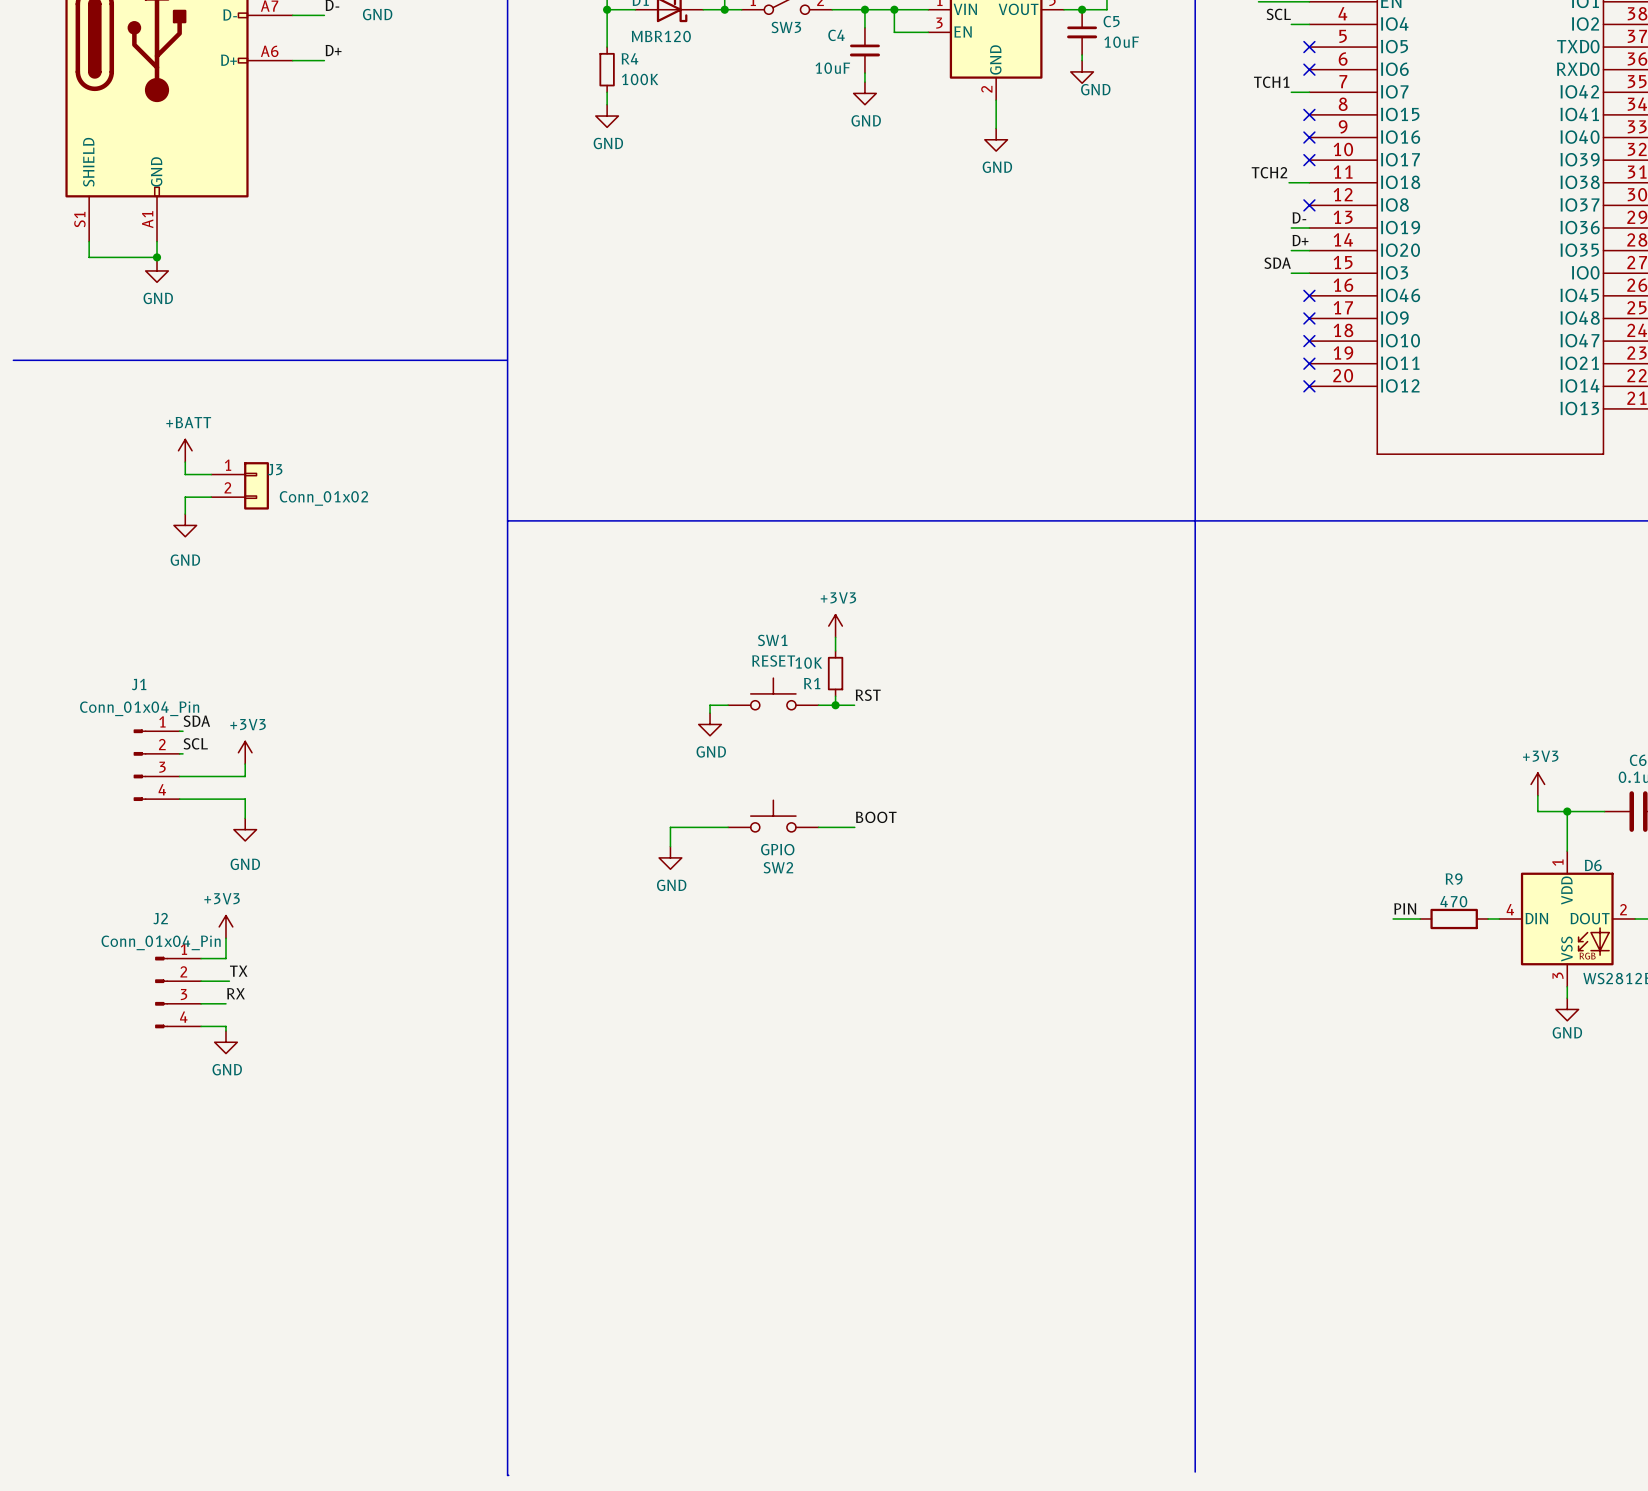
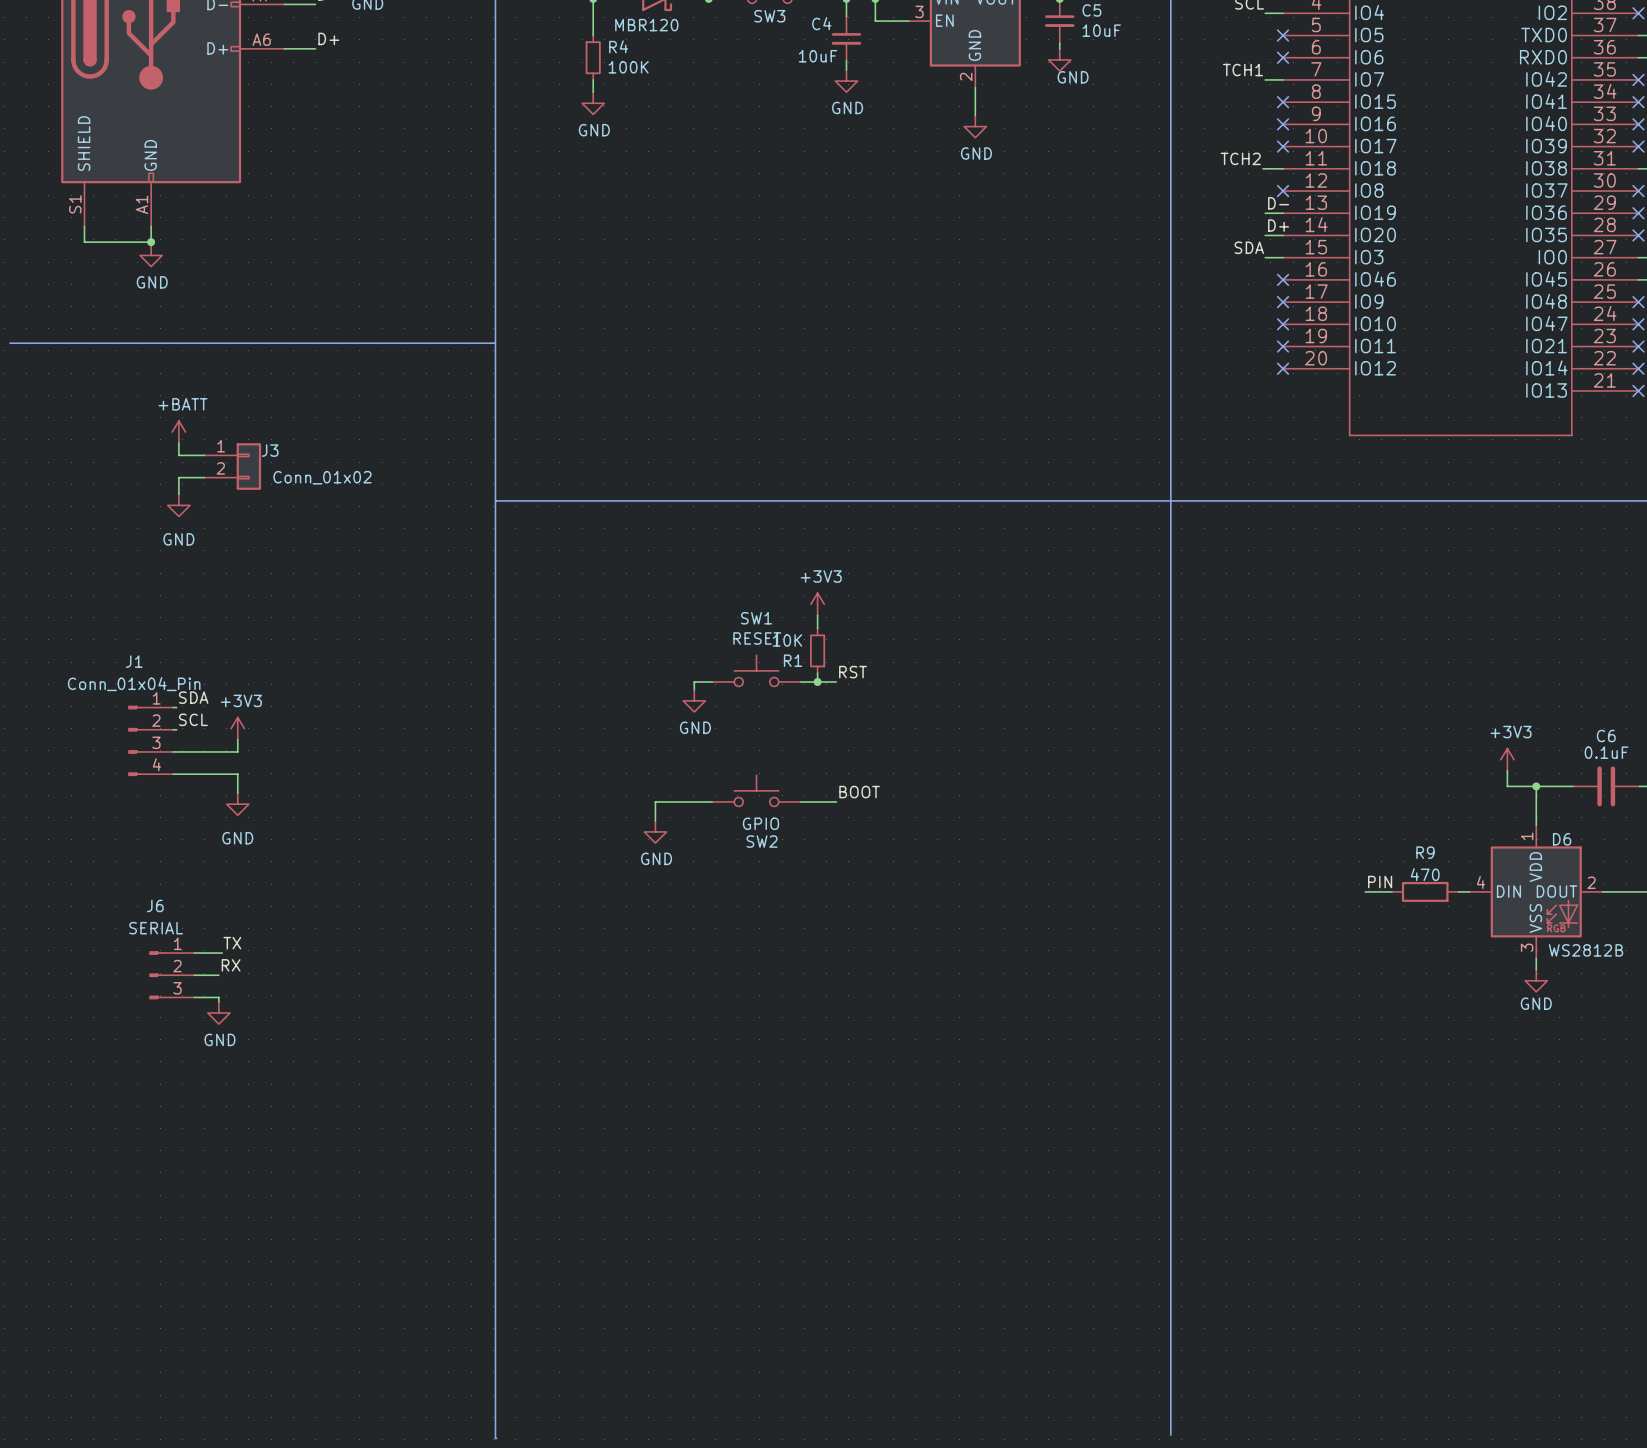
power symbol: +3V3 (225, 926) -> none
wire: (225, 938) (225, 958) (201, 958) -> none
J2: Conn_01x04_Pin (178, 992) -> none
J6: none -> SERIAL (171, 975)

